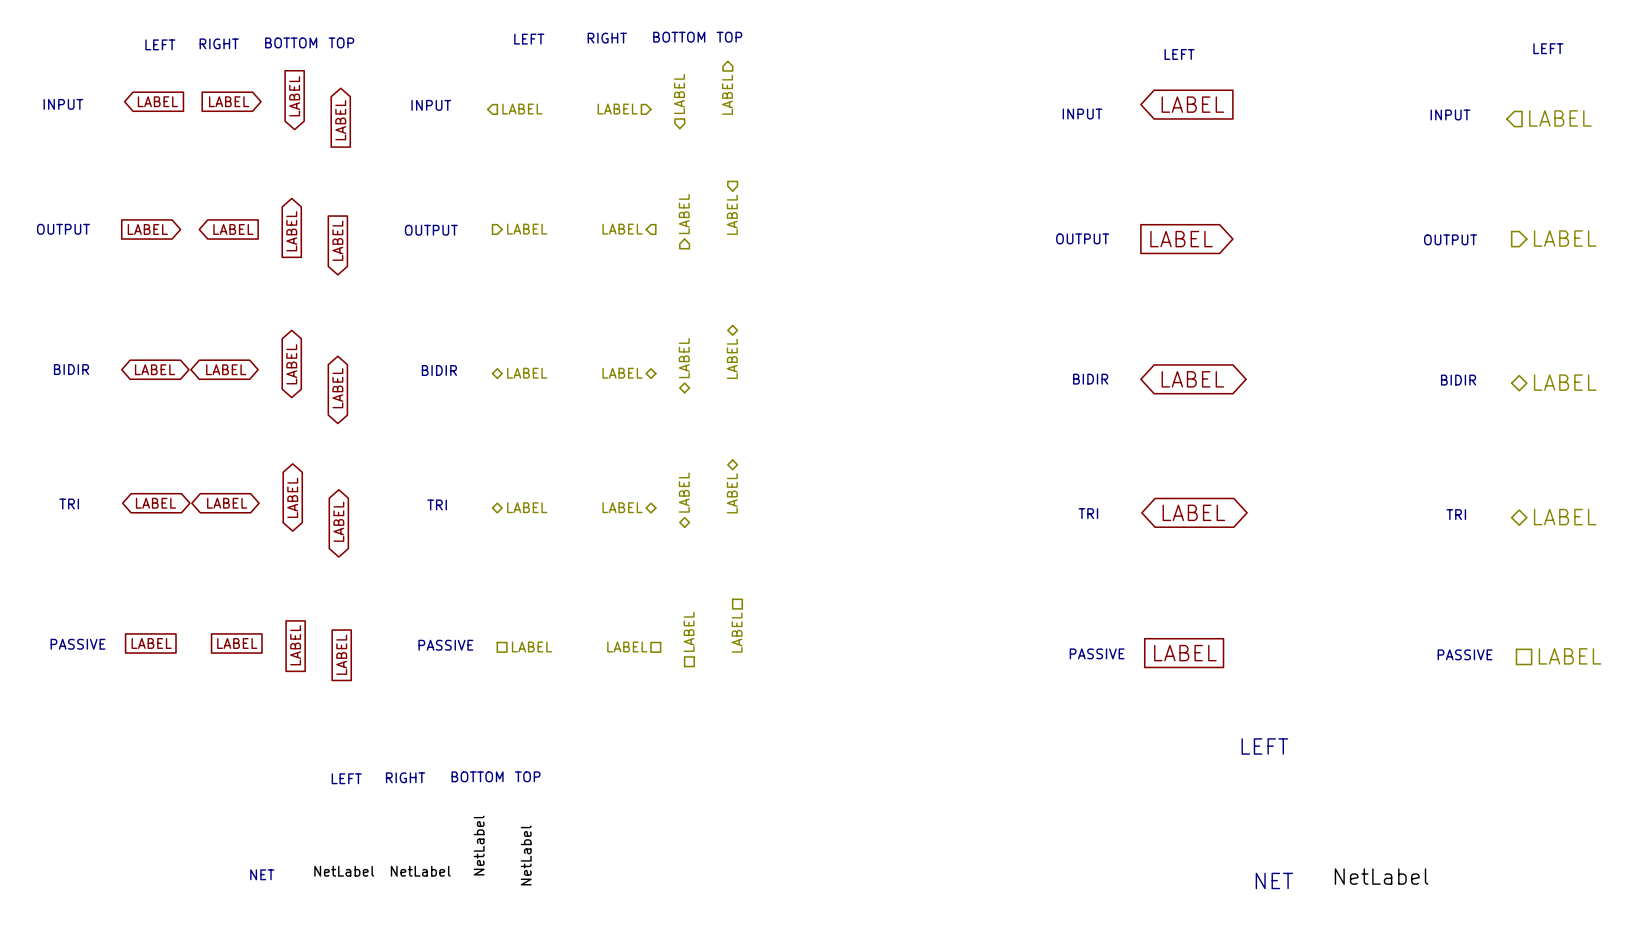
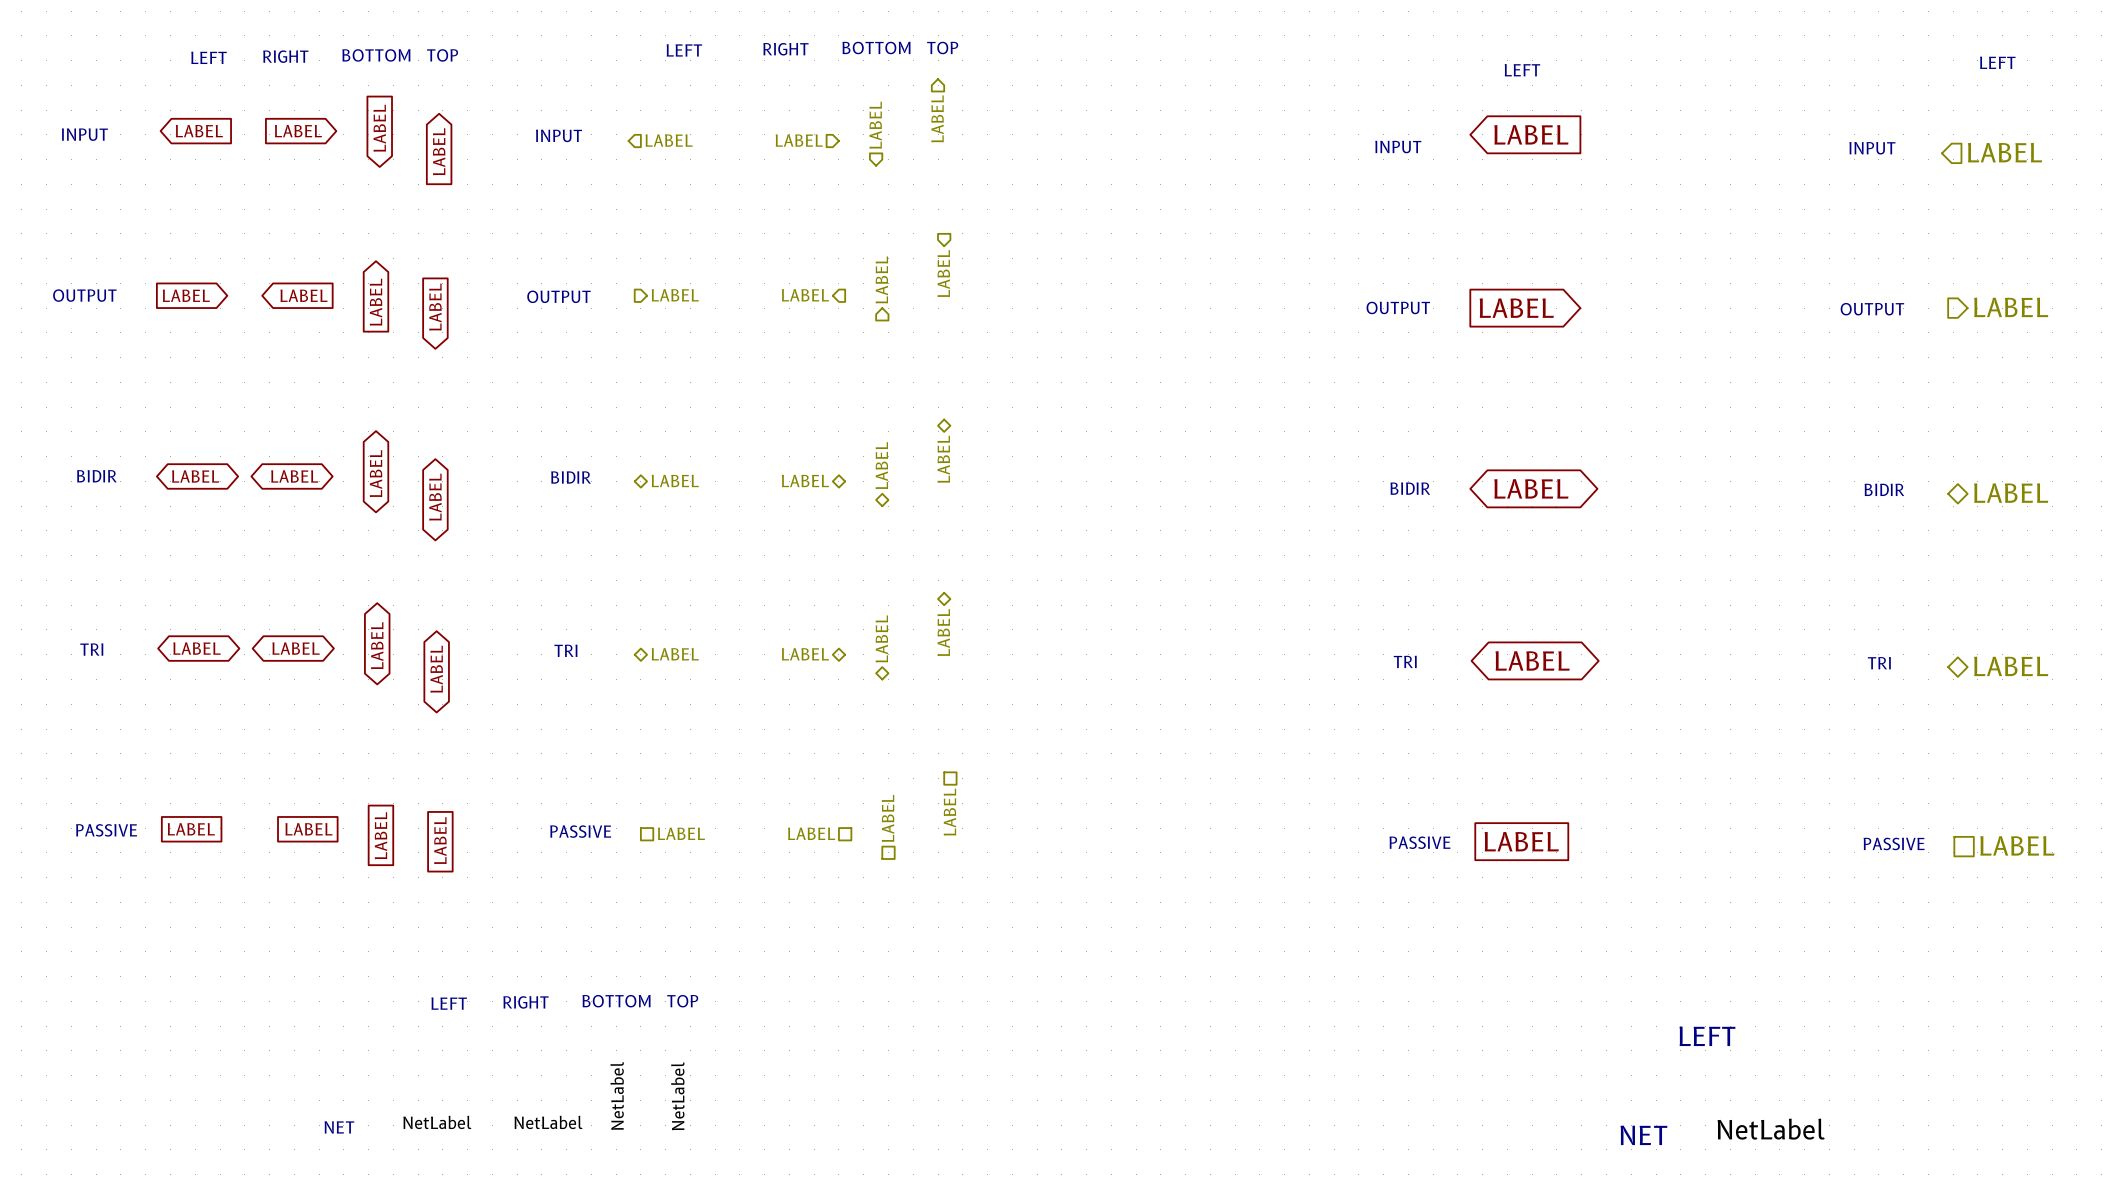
text position: LEFT (1264, 746) -> LEFT (1707, 1036)

